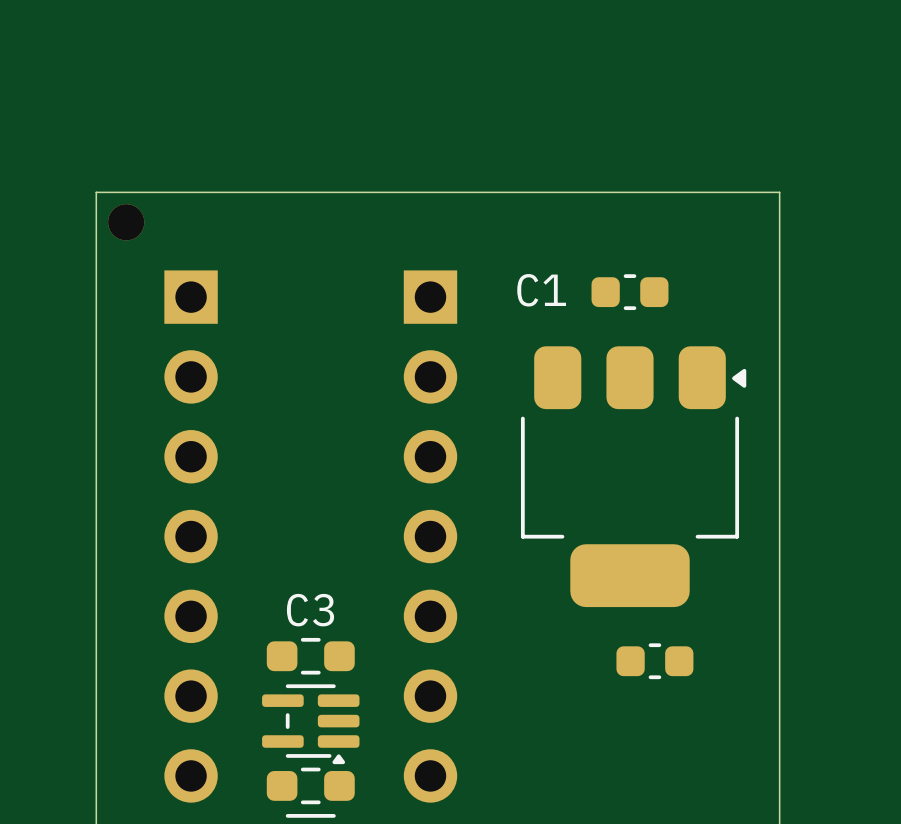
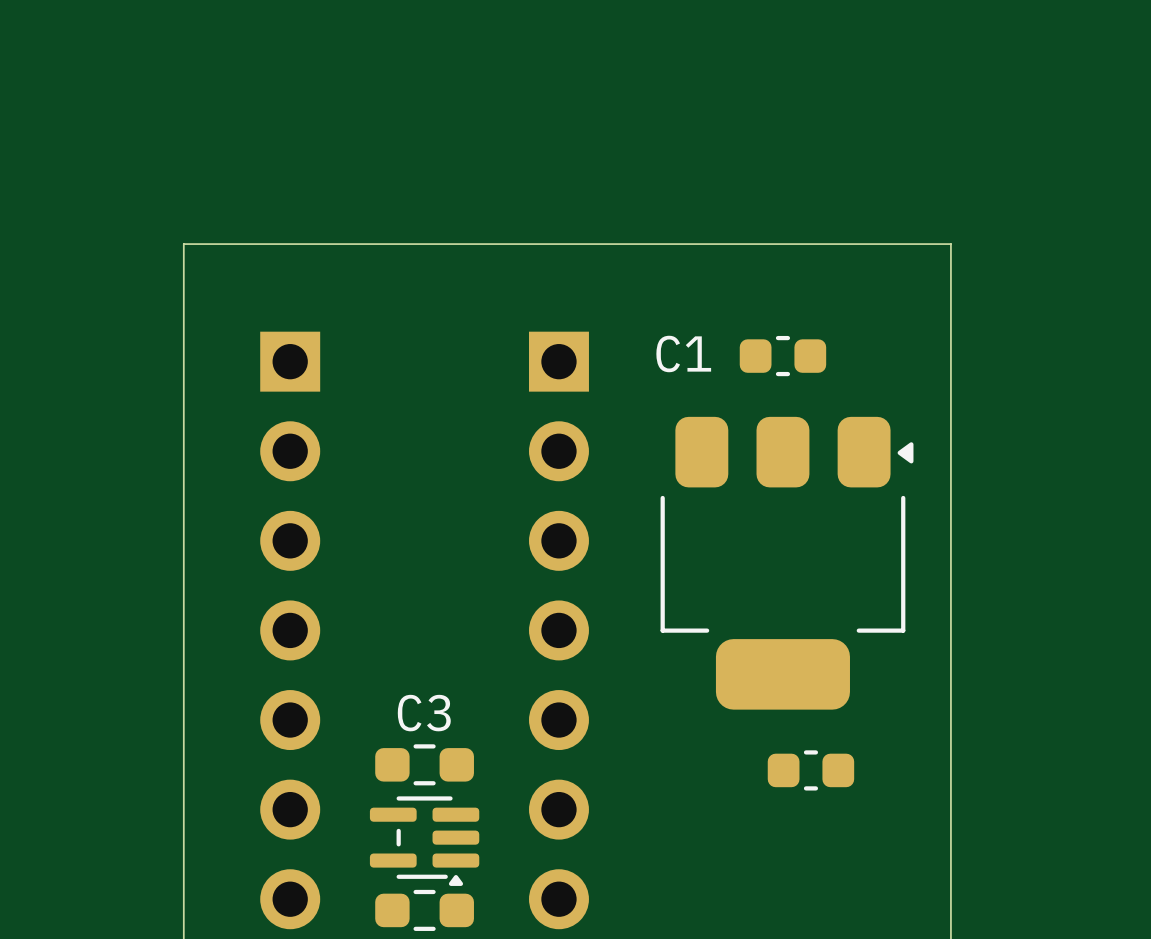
part: (126, 222) -> none

